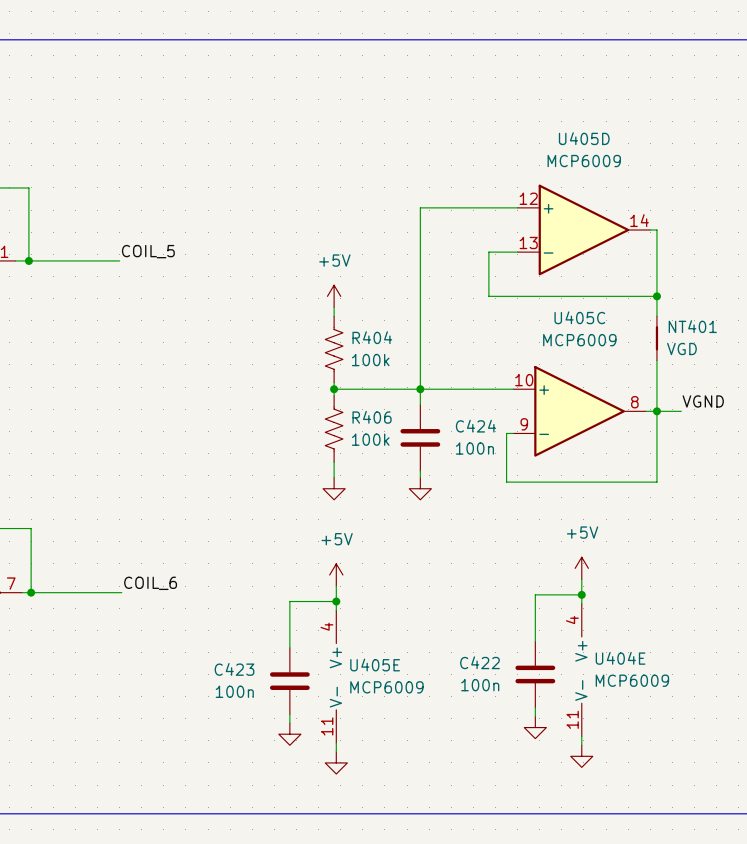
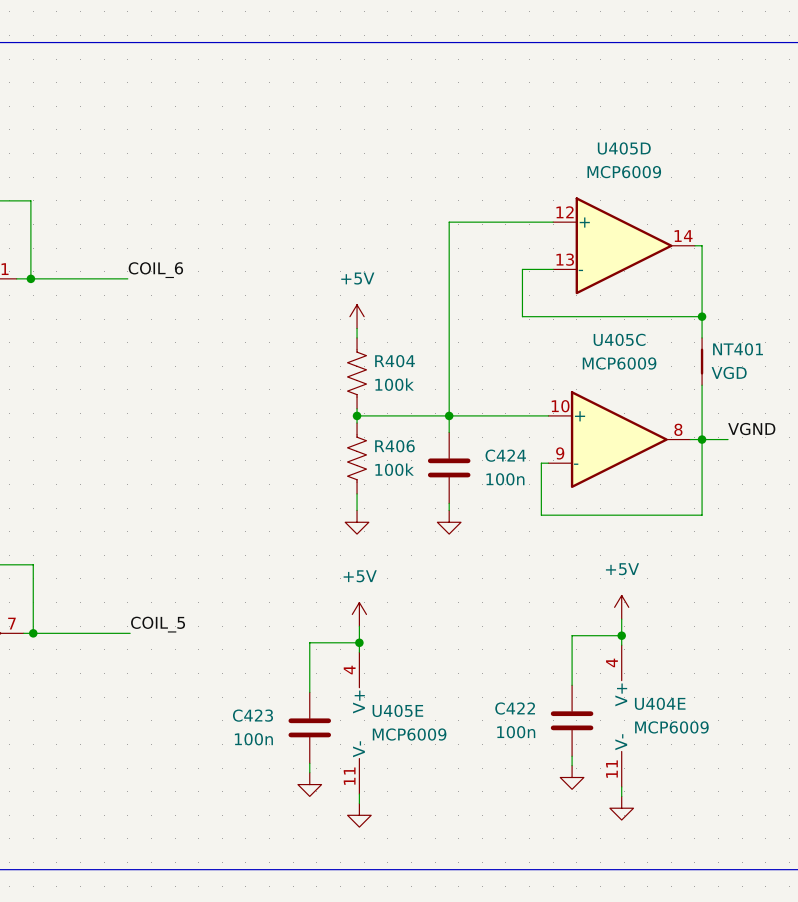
label: COIL_5 (148, 251) -> COIL_6 (155, 270)
label: COIL_6 (150, 583) -> COIL_5 (158, 624)

